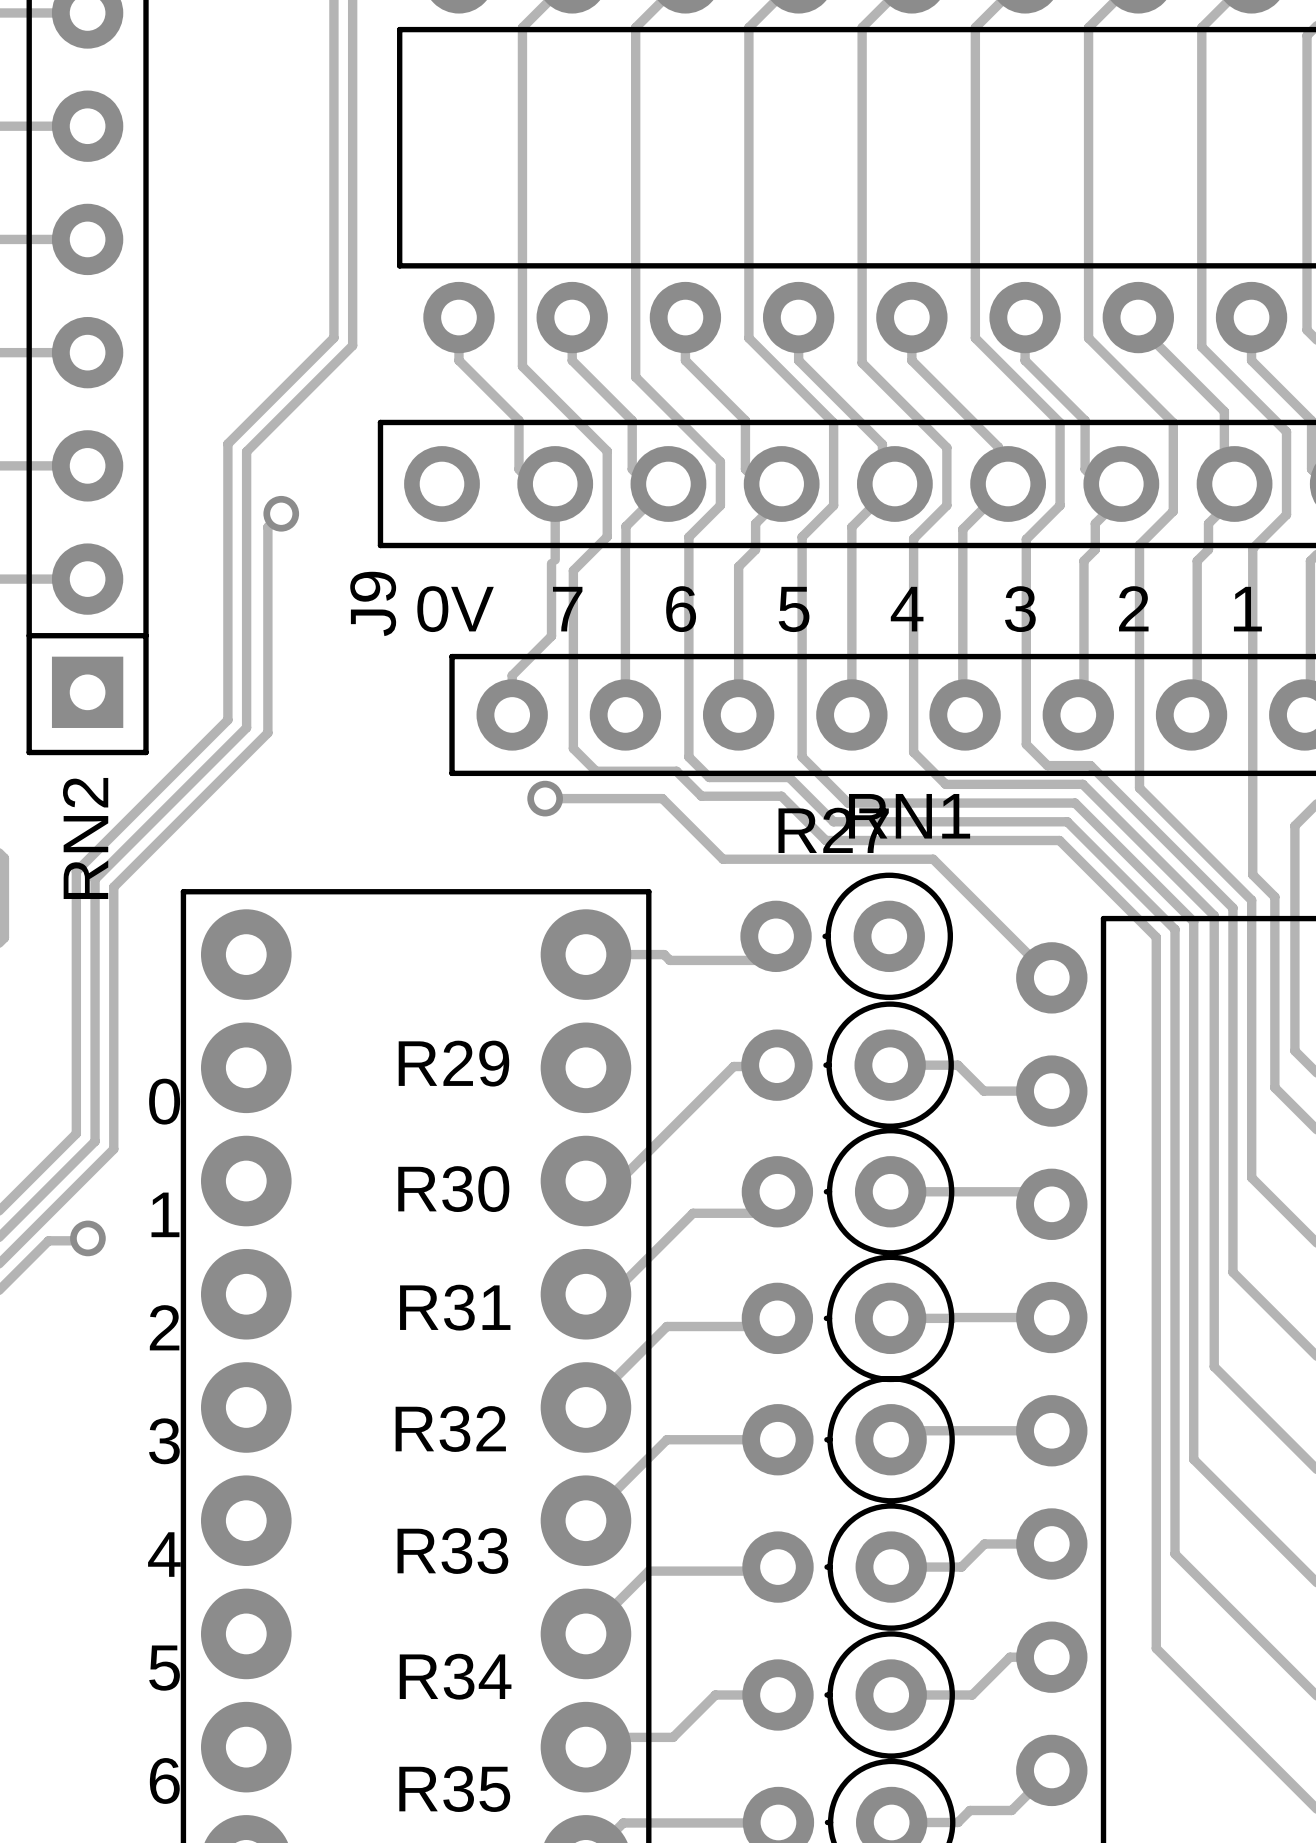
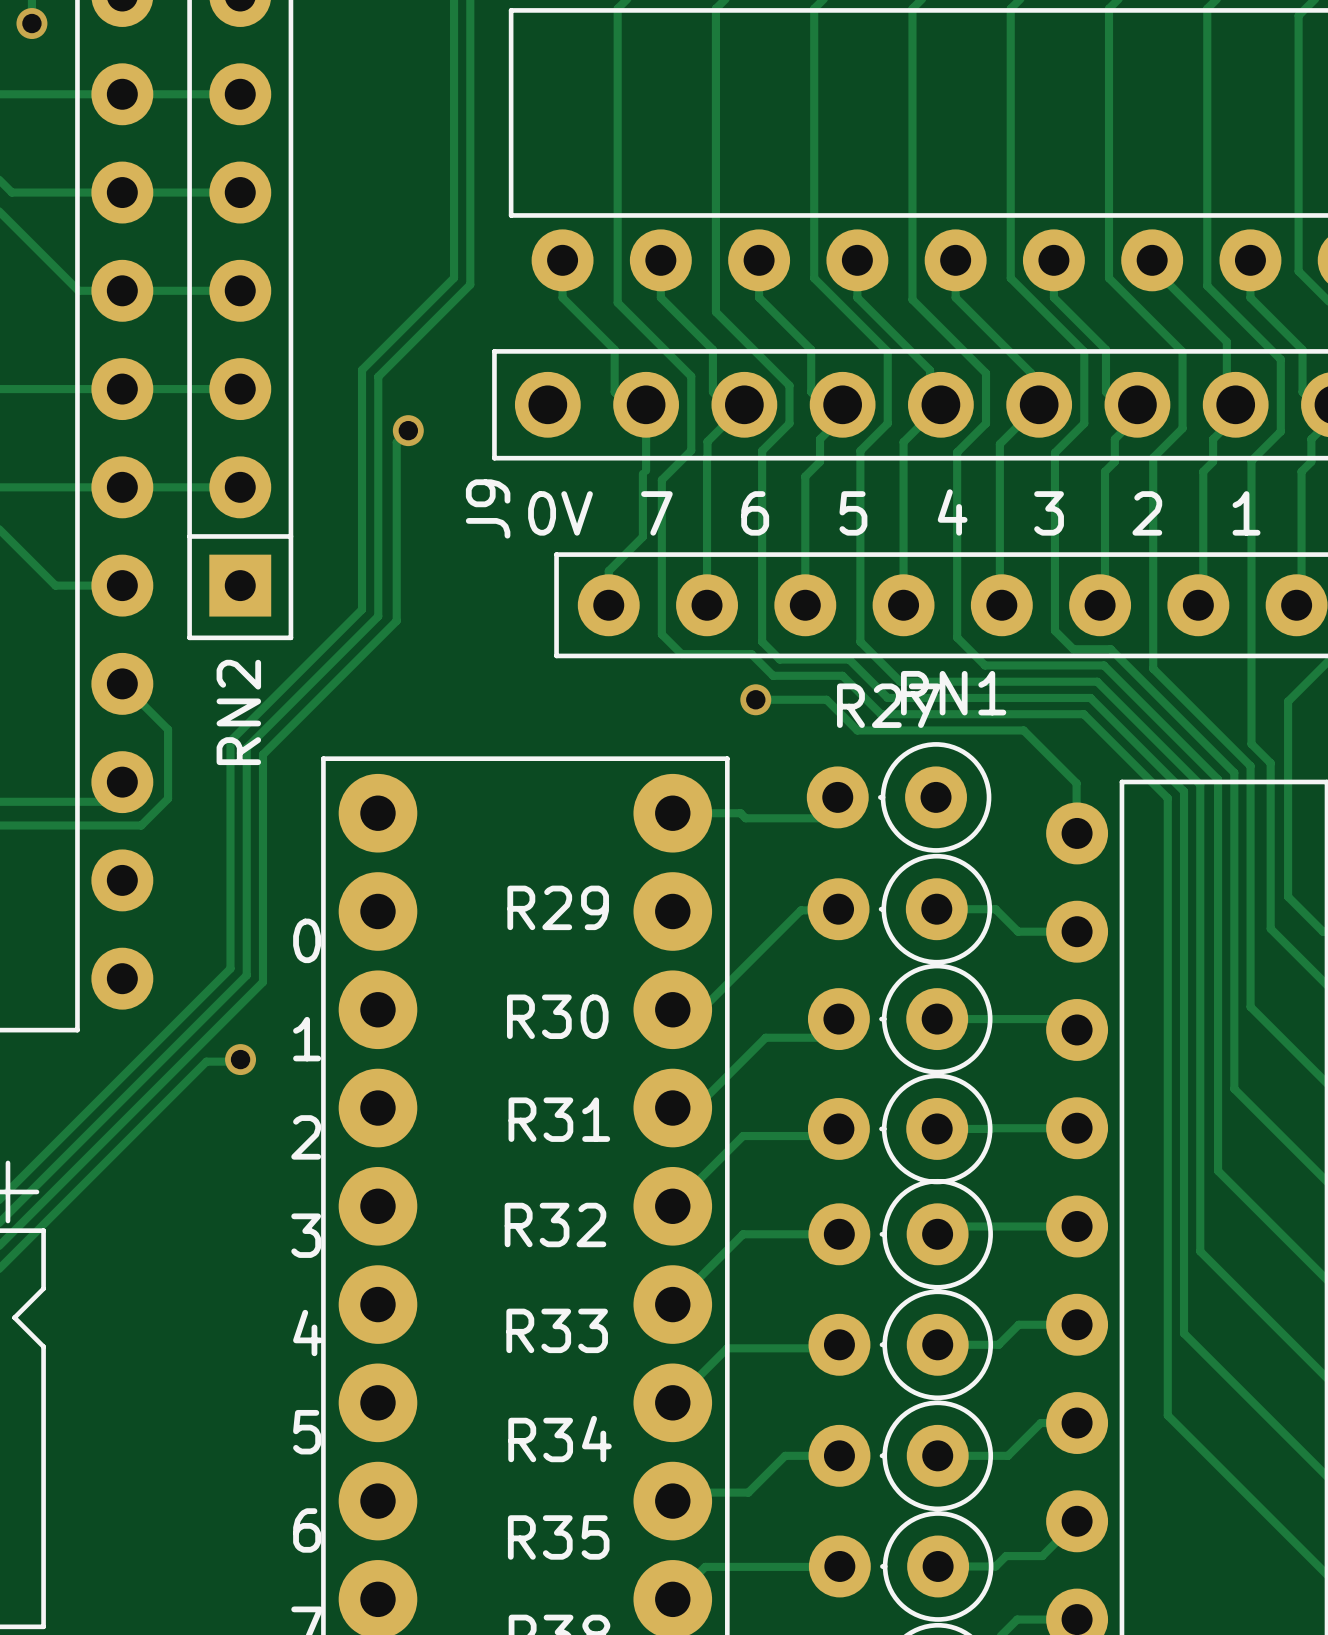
track: (545, 798) (662, 798) (723, 859) (798, 859) -> (755, 699) (826, 699) (857, 730)
via position: (545, 798) -> (755, 699)
track: (933, 859) (1051, 977) -> (974, 730) (1023, 730) (1076, 783) (1076, 805)

